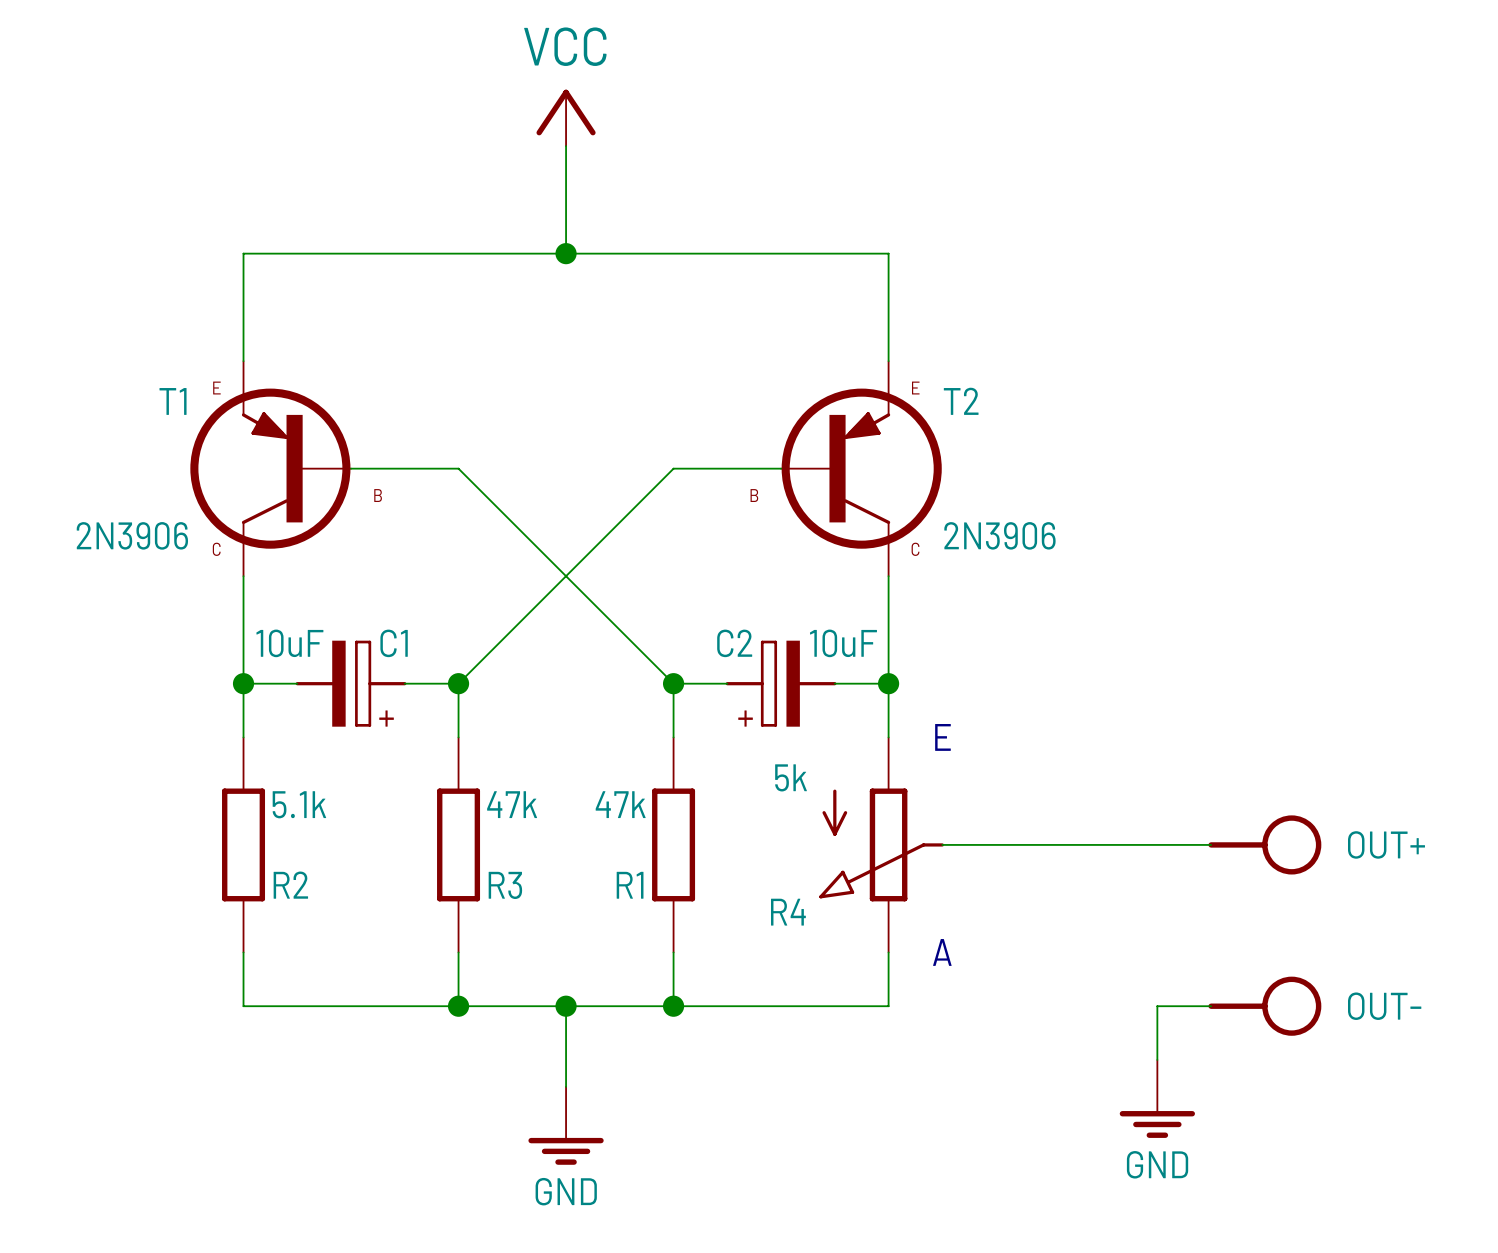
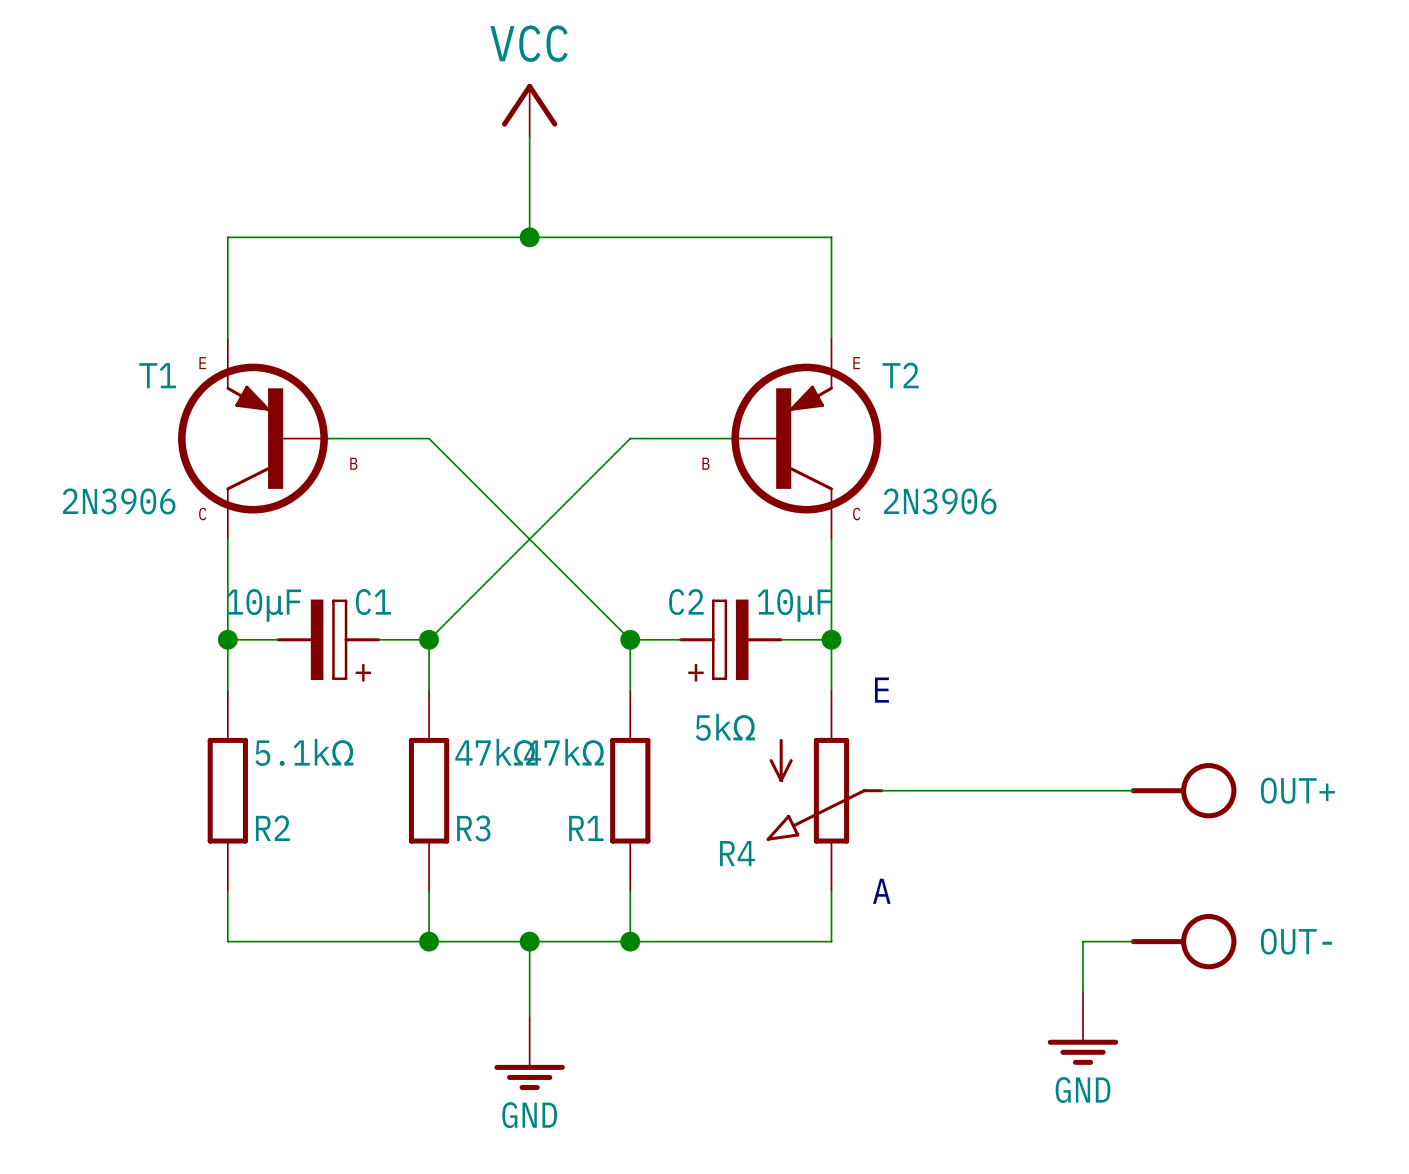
C1 value: 10uF (289, 643) -> 10μF (263, 605)
C2 value: 10uF (843, 643) -> 10μF (794, 605)
R4 value: 5k (791, 777) -> 5kΩ (725, 727)
R2 value: 5.1k (299, 804) -> 5.1kΩ (304, 752)
R3 value: 47k (512, 804) -> 47kΩ (495, 752)
R1 value: 47k (620, 804) -> 47kΩ (564, 752)

